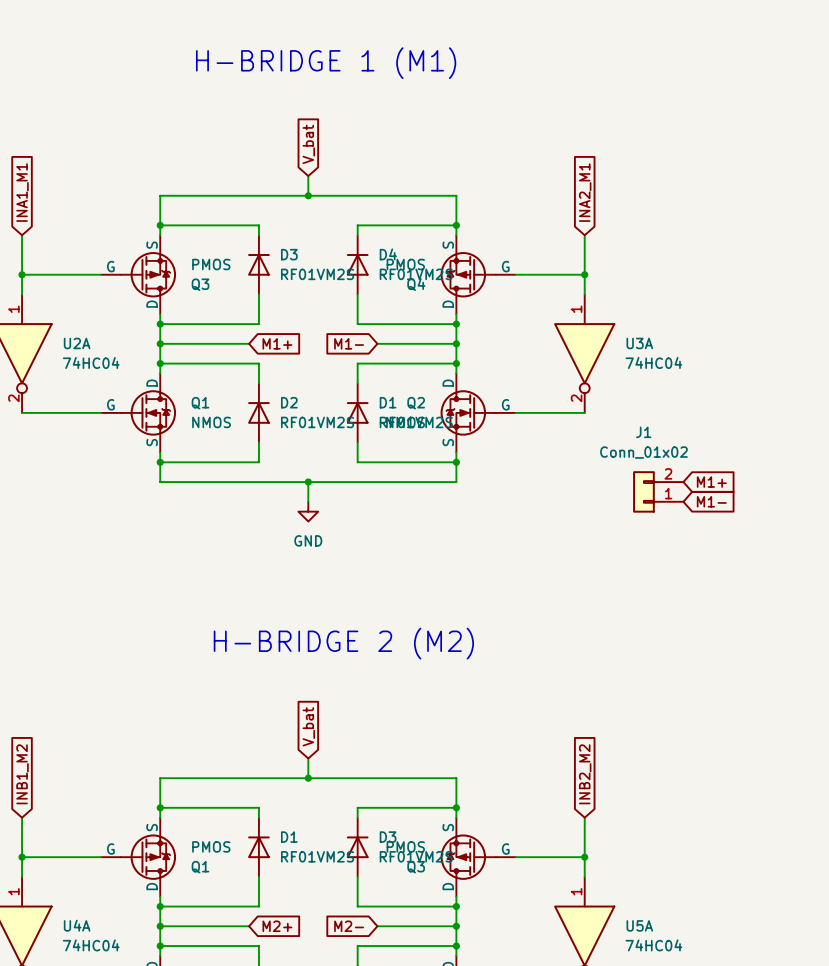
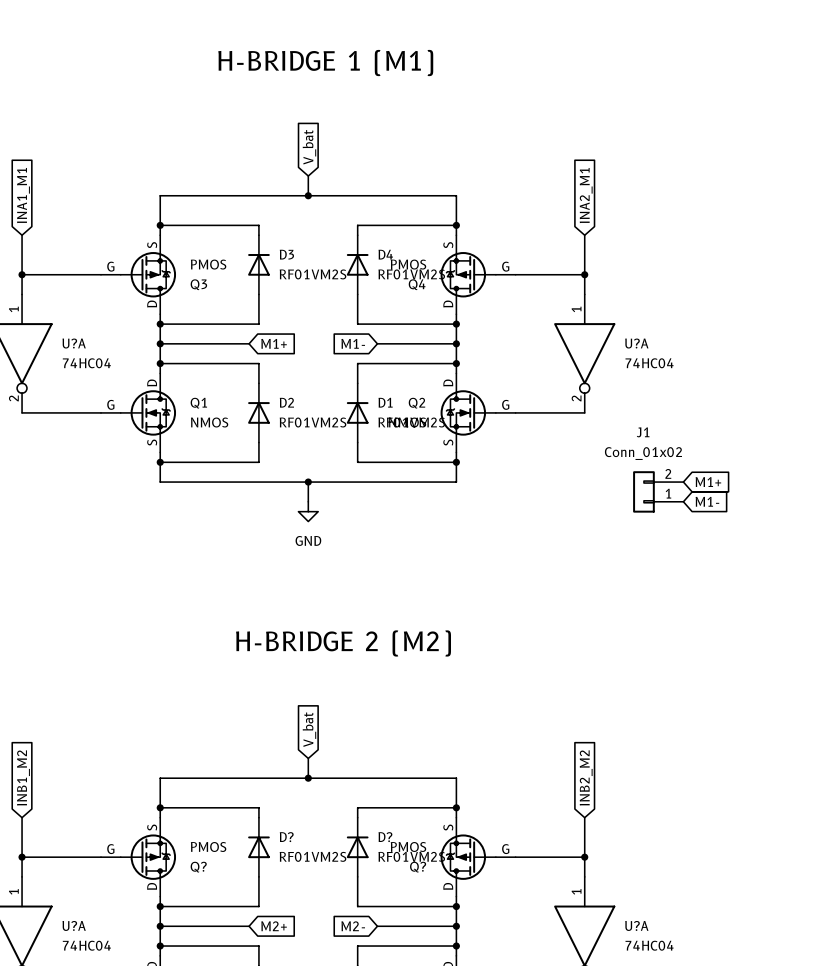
U2A name: U2A (77, 343) -> U?A (74, 343)
U3A name: U3A (639, 343) -> U?A (636, 343)
D1 name: D1 (289, 837) -> D? (286, 837)
D3 name: D3 (388, 837) -> D? (385, 837)
Q1 name: Q1 (200, 867) -> Q? (198, 867)
Q3 name: Q3 (416, 867) -> Q? (418, 867)
U4A name: U4A (77, 925) -> U?A (74, 925)
U5A name: U5A (639, 925) -> U?A (636, 925)

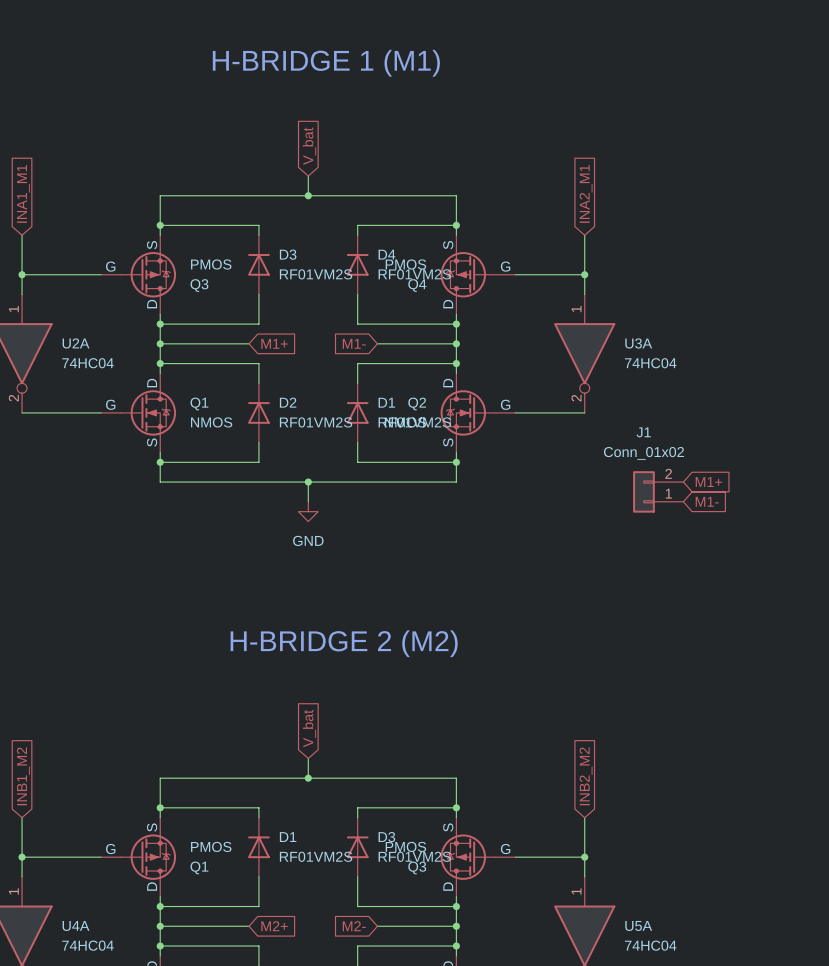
U?A name: U?A (74, 343) -> U2A (76, 343)
U?A name: U?A (636, 343) -> U3A (638, 343)
D? name: D? (286, 837) -> D1 (288, 837)
D? name: D? (385, 837) -> D3 (386, 837)
Q? name: Q? (198, 867) -> Q1 (199, 867)
Q? name: Q? (418, 867) -> Q3 (417, 867)
U?A name: U?A (74, 925) -> U4A (76, 925)
U?A name: U?A (636, 925) -> U5A (638, 925)

